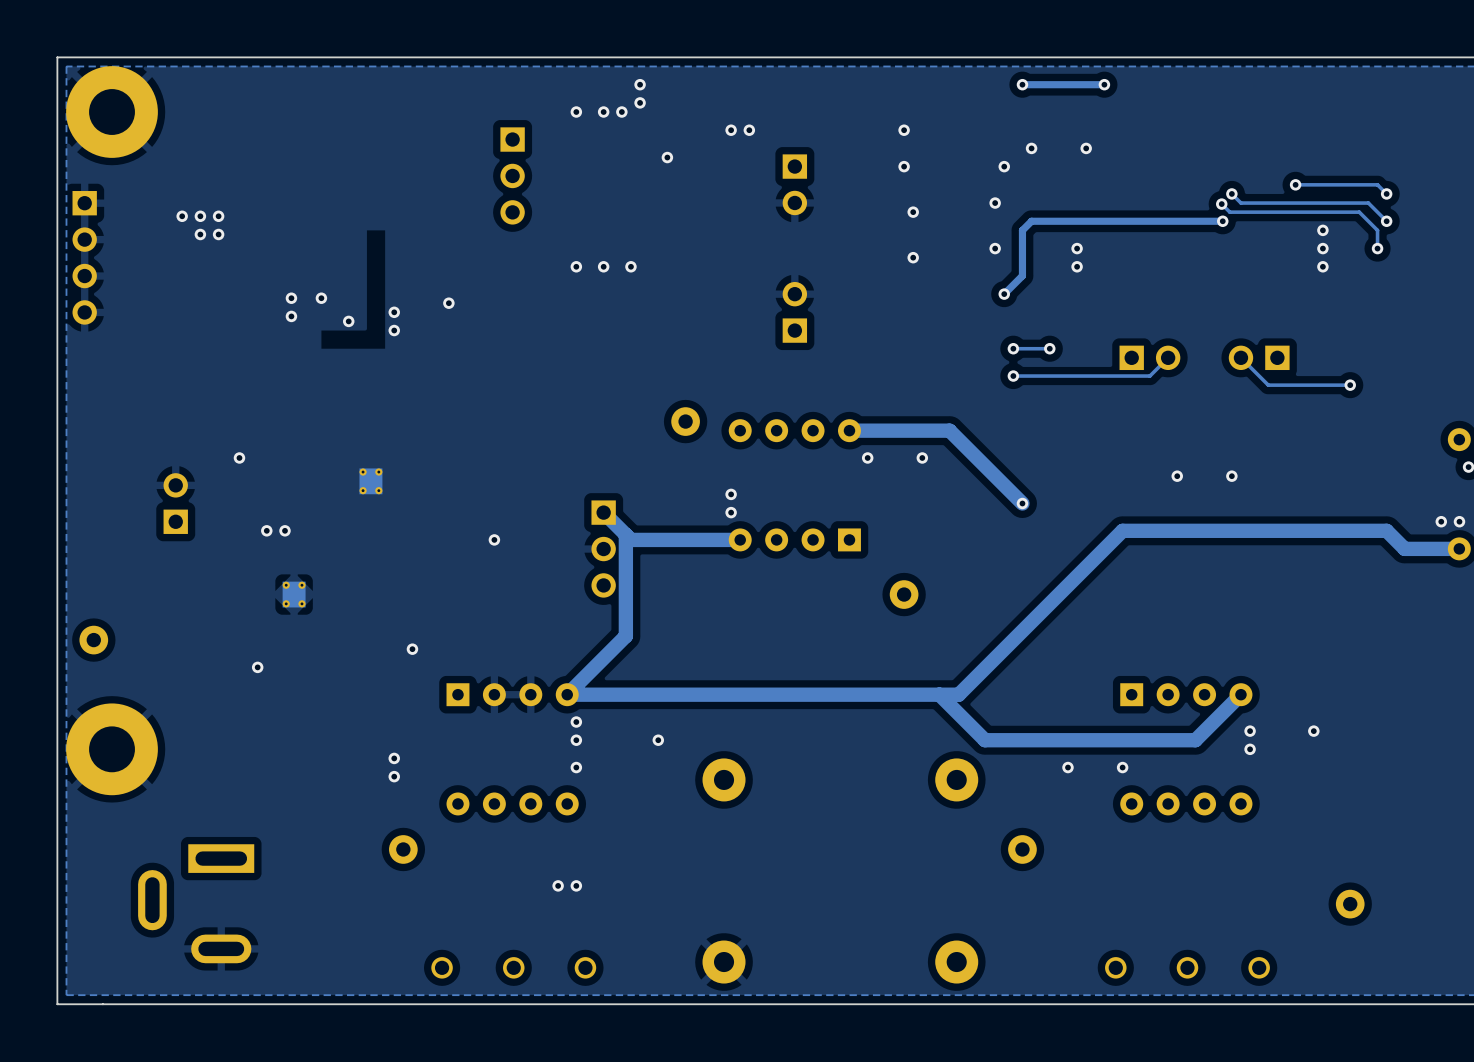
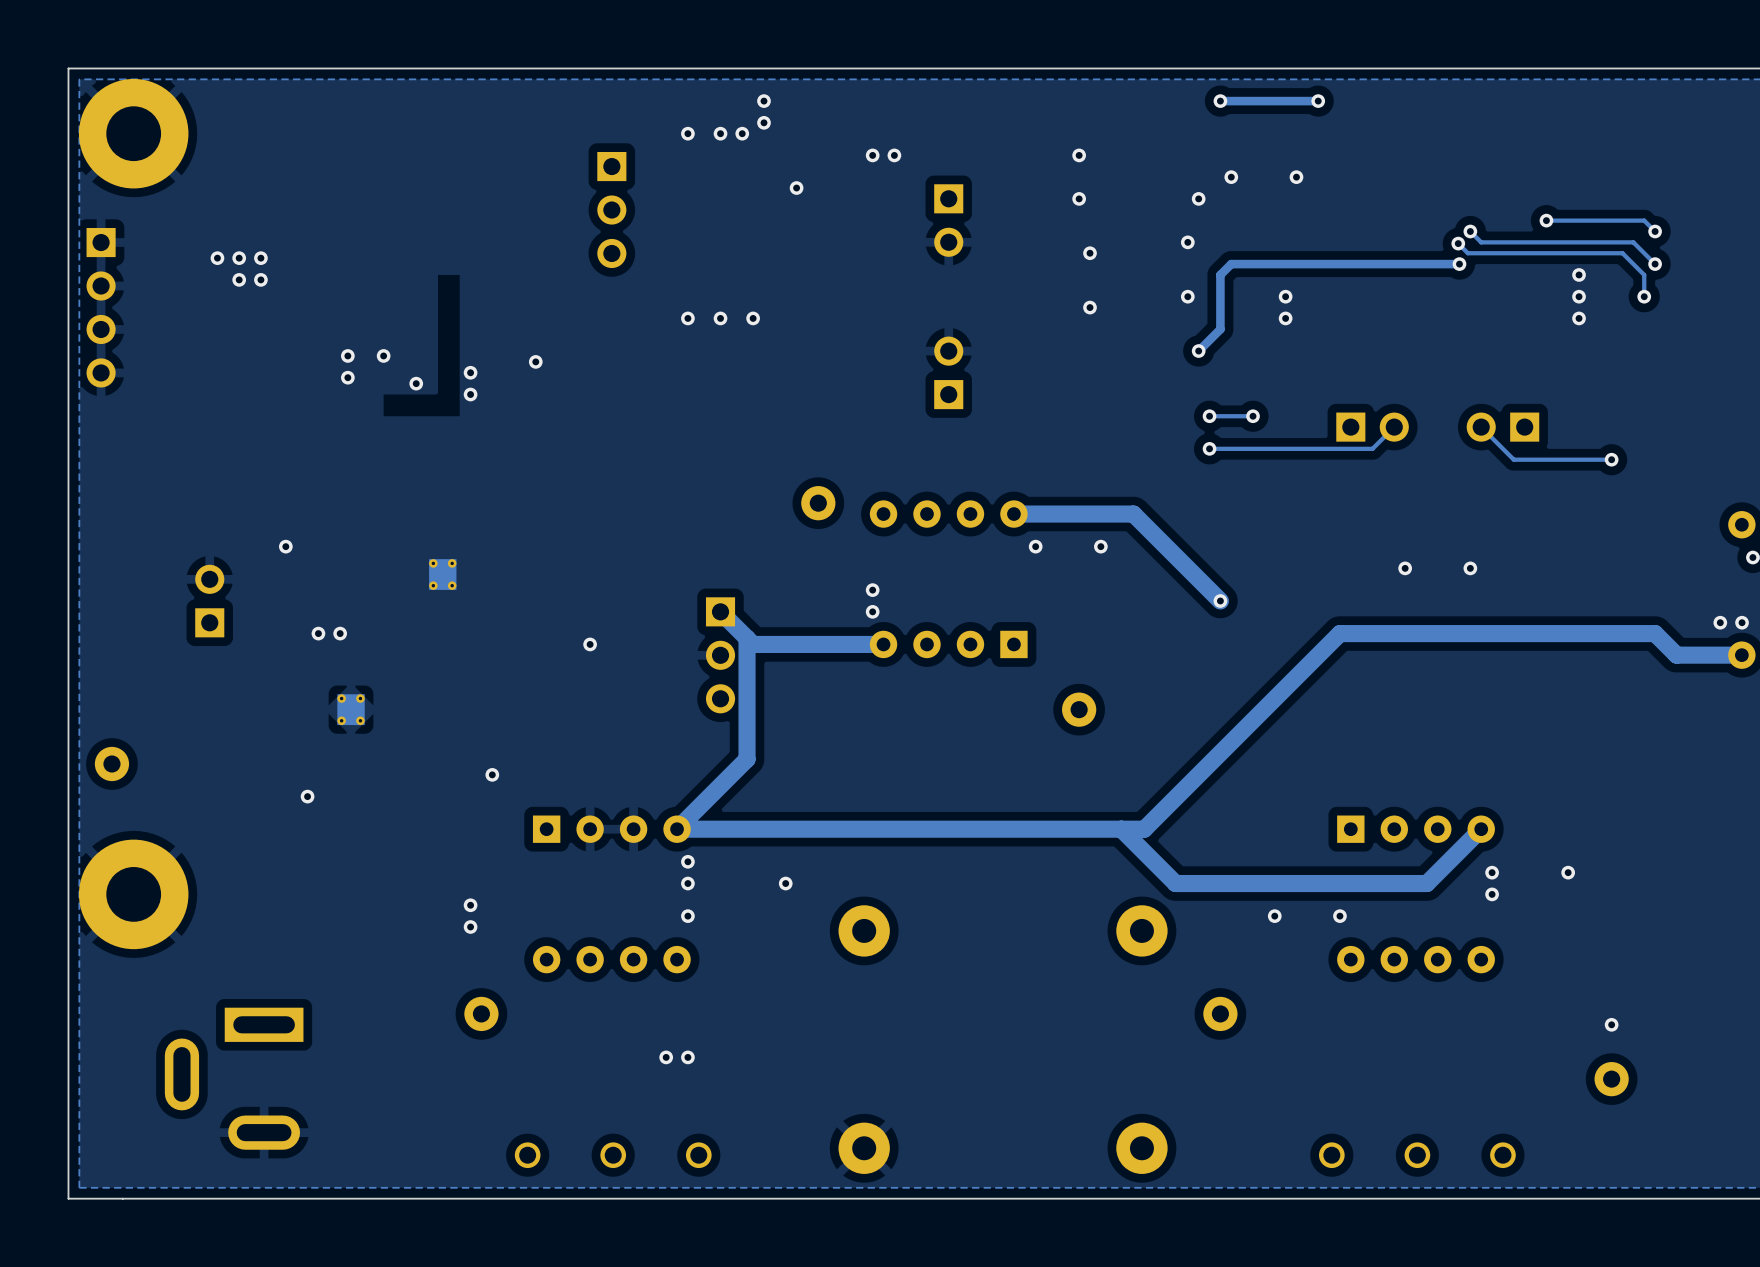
via: none -> (1611, 1024)

